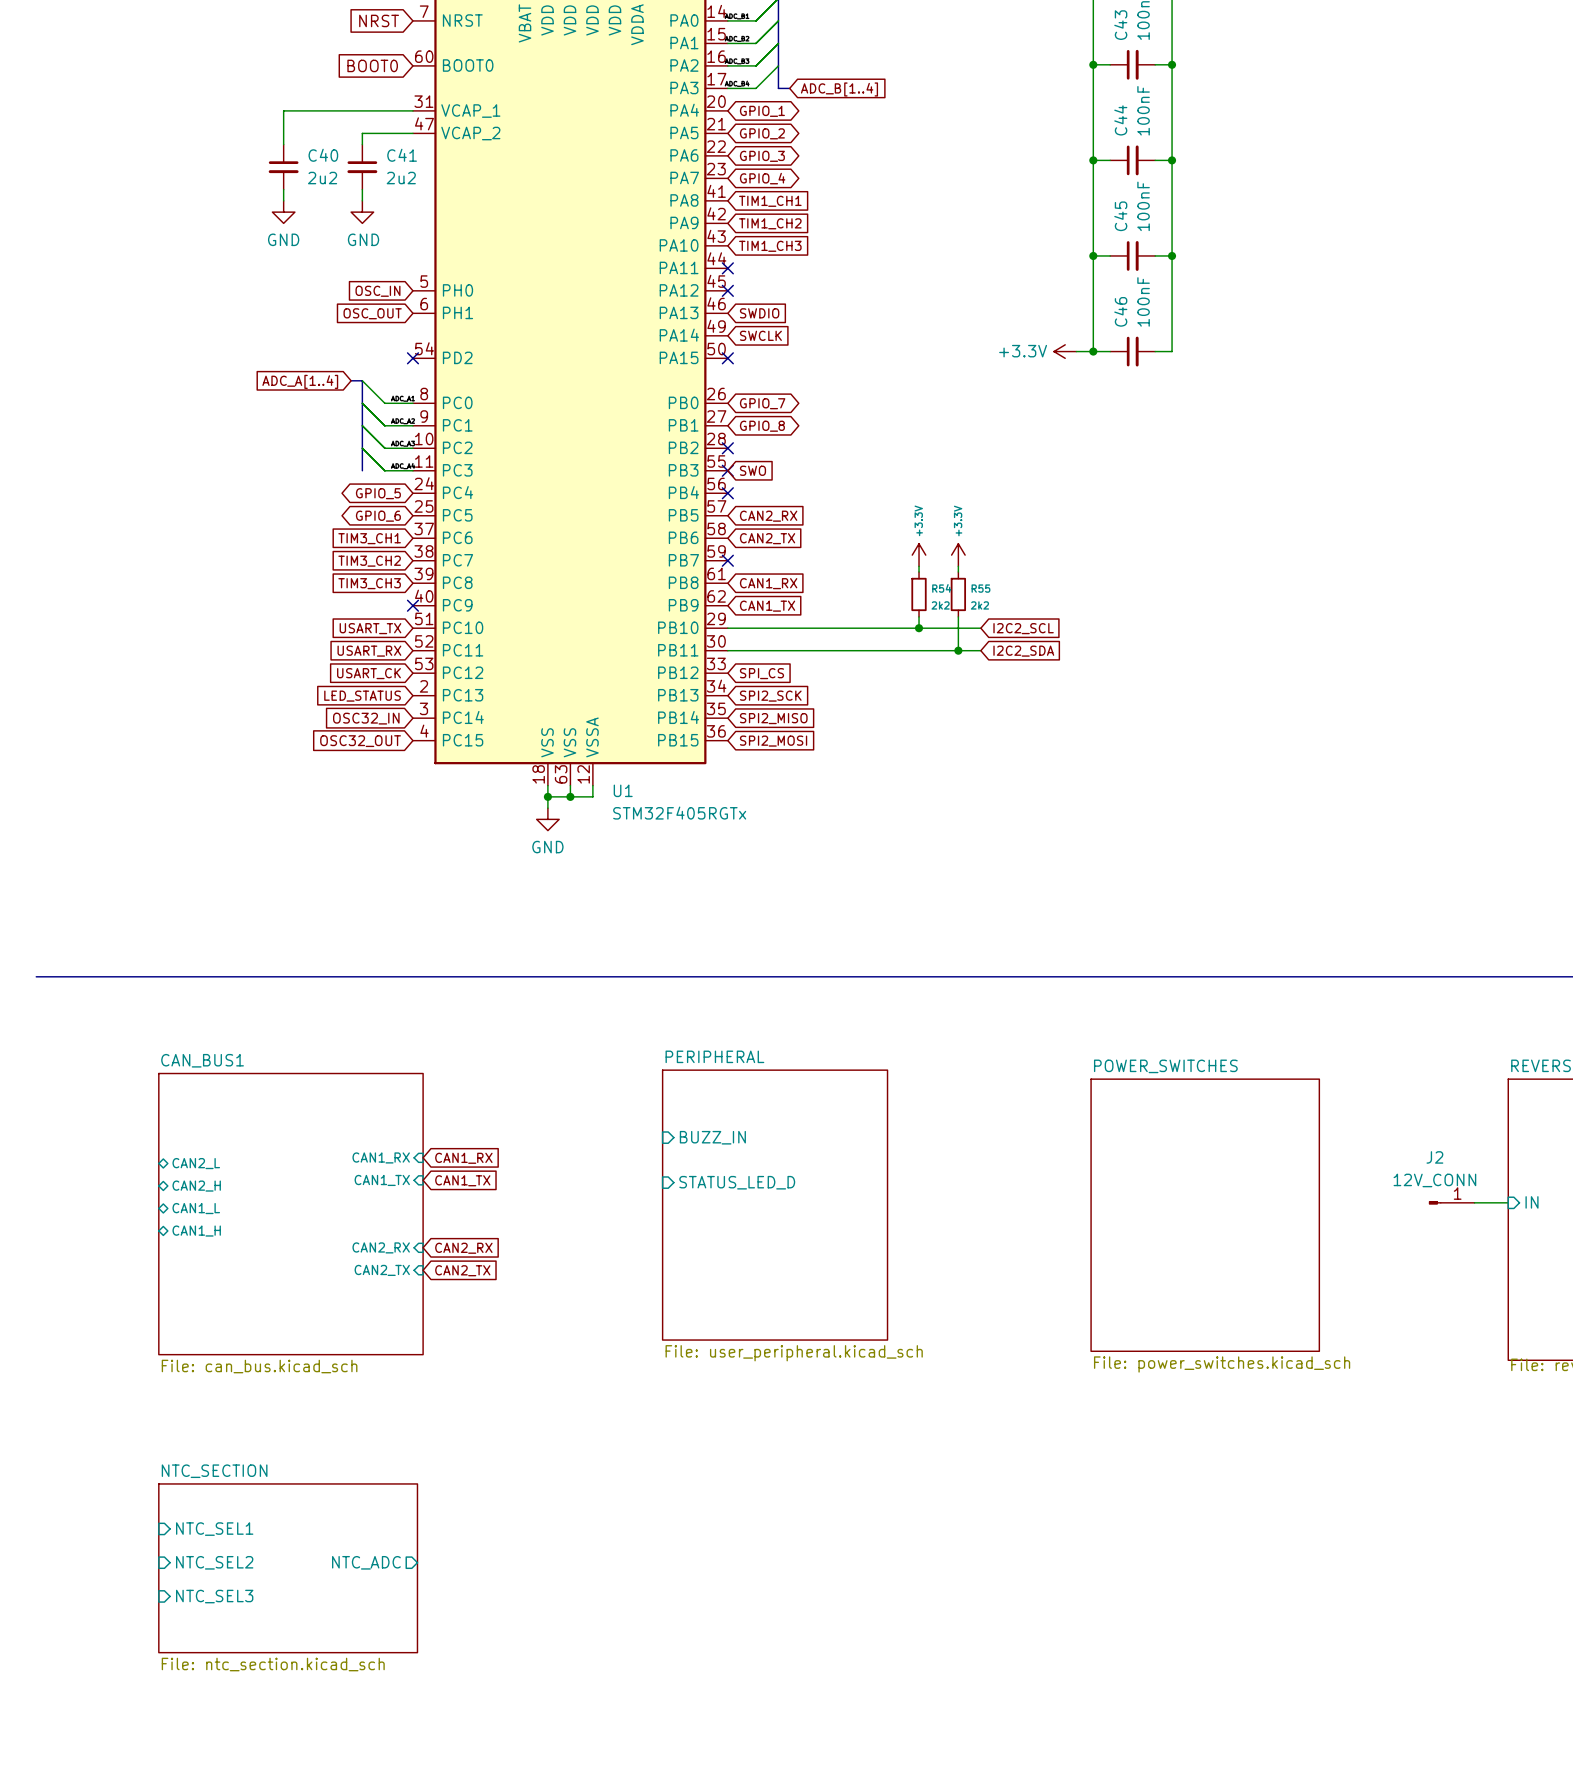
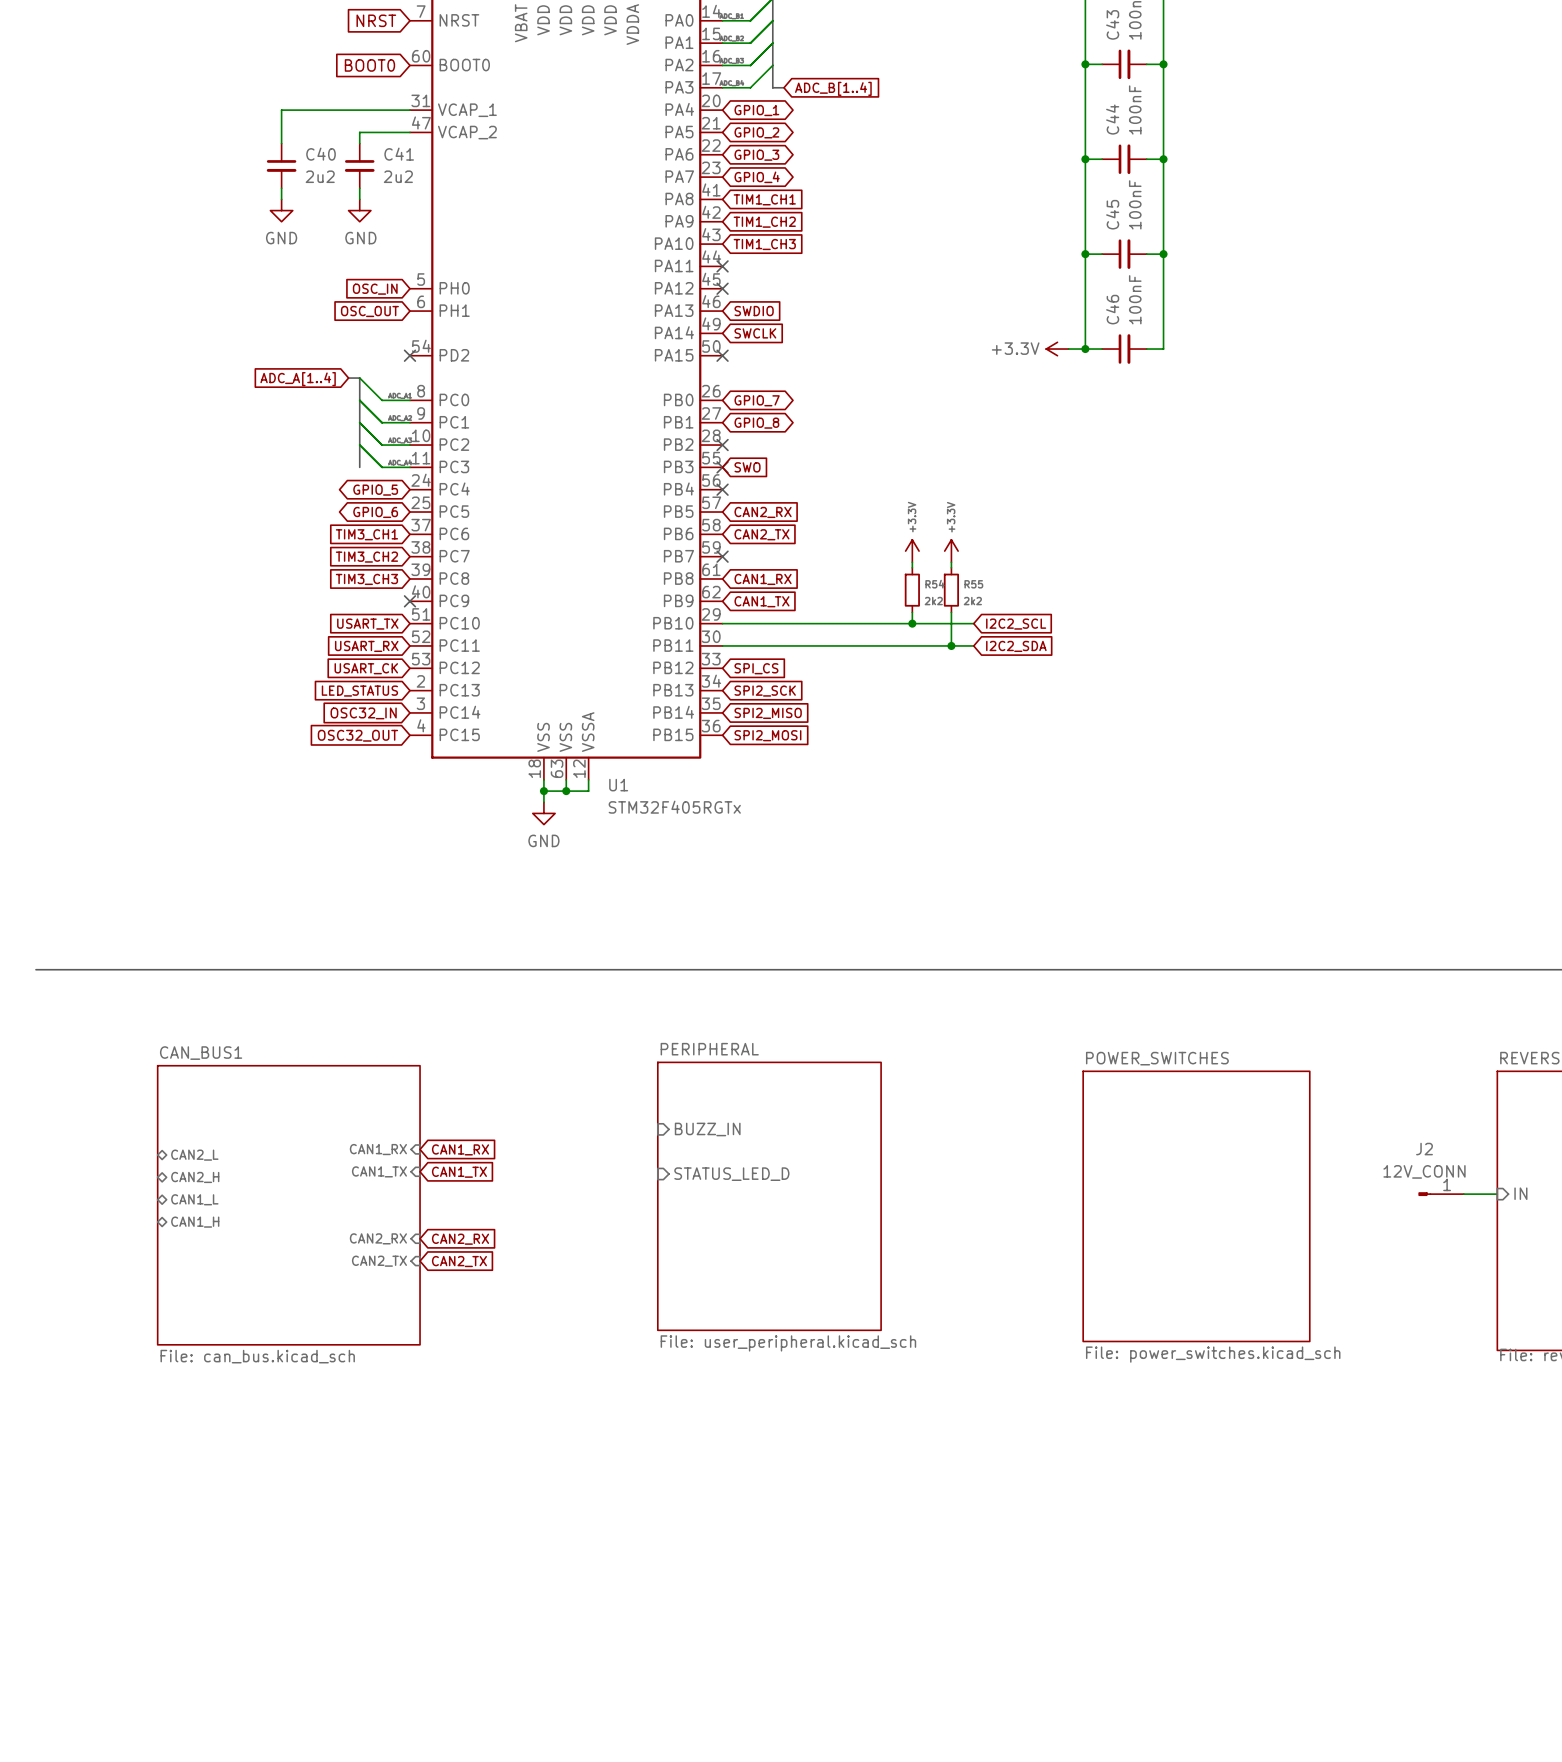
sheet pin: NTC_SEL1 (214, 1529) -> none
sheet pin: NTC_SEL2 (214, 1562) -> none
sheet pin: NTC_ADC (366, 1562) -> none
sheet NTC_SECTION: File: ntc_section.kicad_sch (288, 1568) -> none
sheet pin: NTC_SEL3 (214, 1596) -> none

